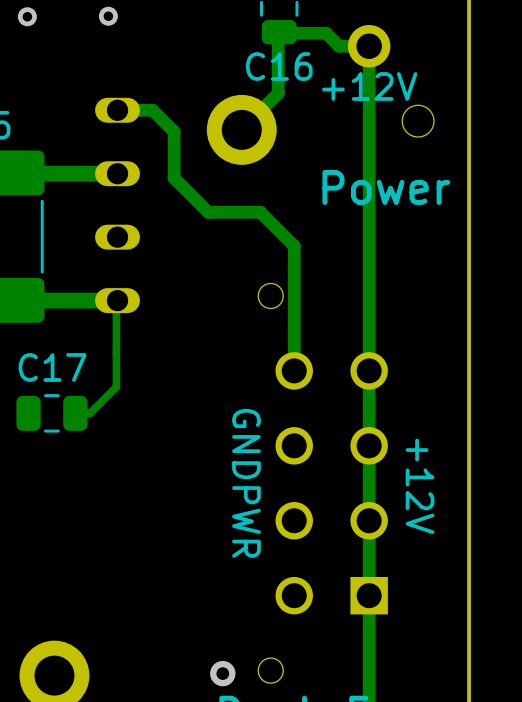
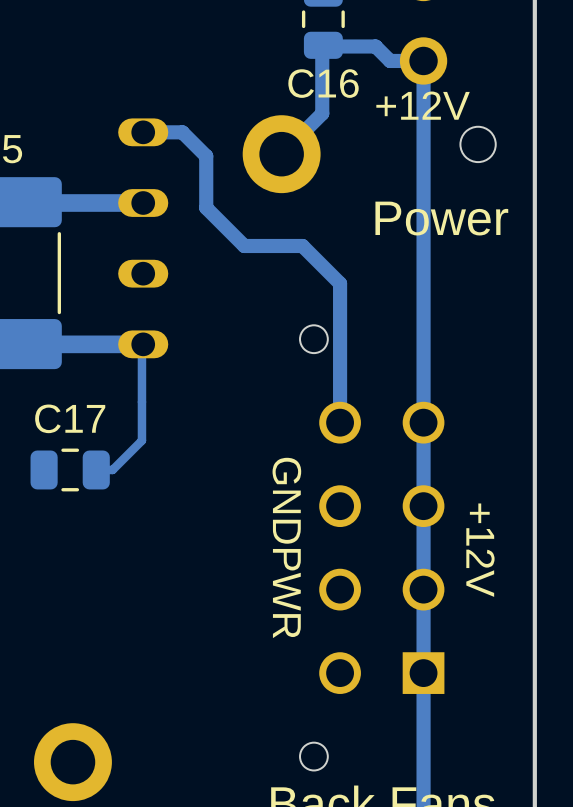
via: (27, 16) -> none
via: (108, 16) -> none
via: (222, 673) -> none

